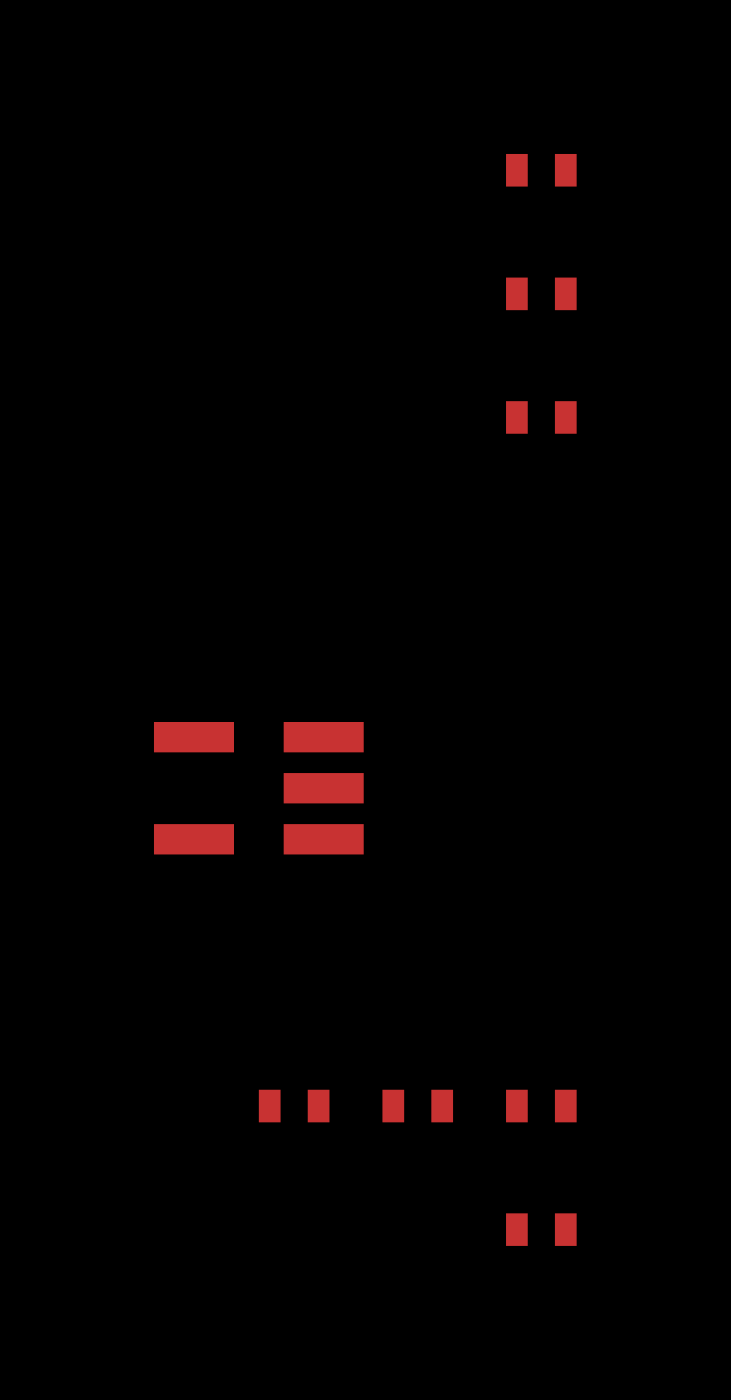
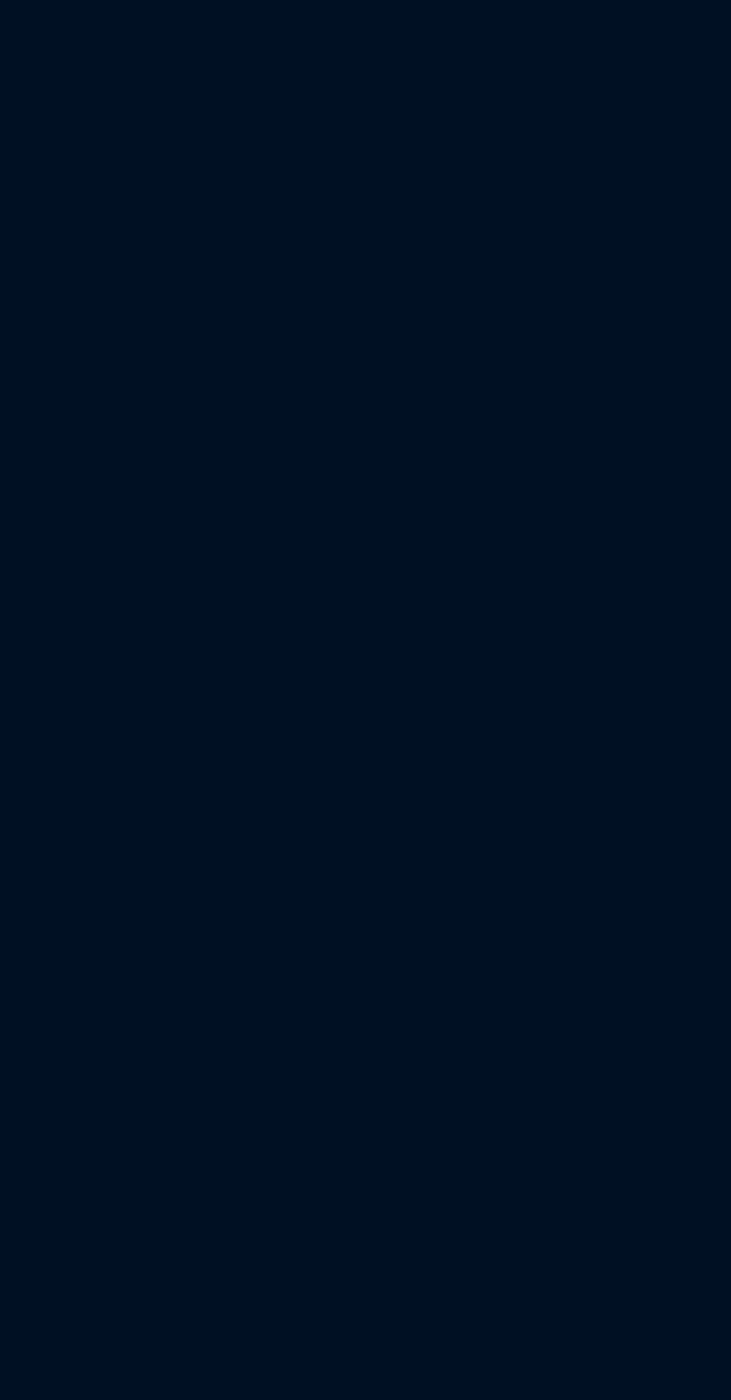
part: (541, 170) -> none
part: (541, 293) -> none
part: (541, 417) -> none
part: (258, 788) -> none
part: (294, 1106) -> none
part: (417, 1106) -> none
part: (541, 1106) -> none
part: (541, 1229) -> none

